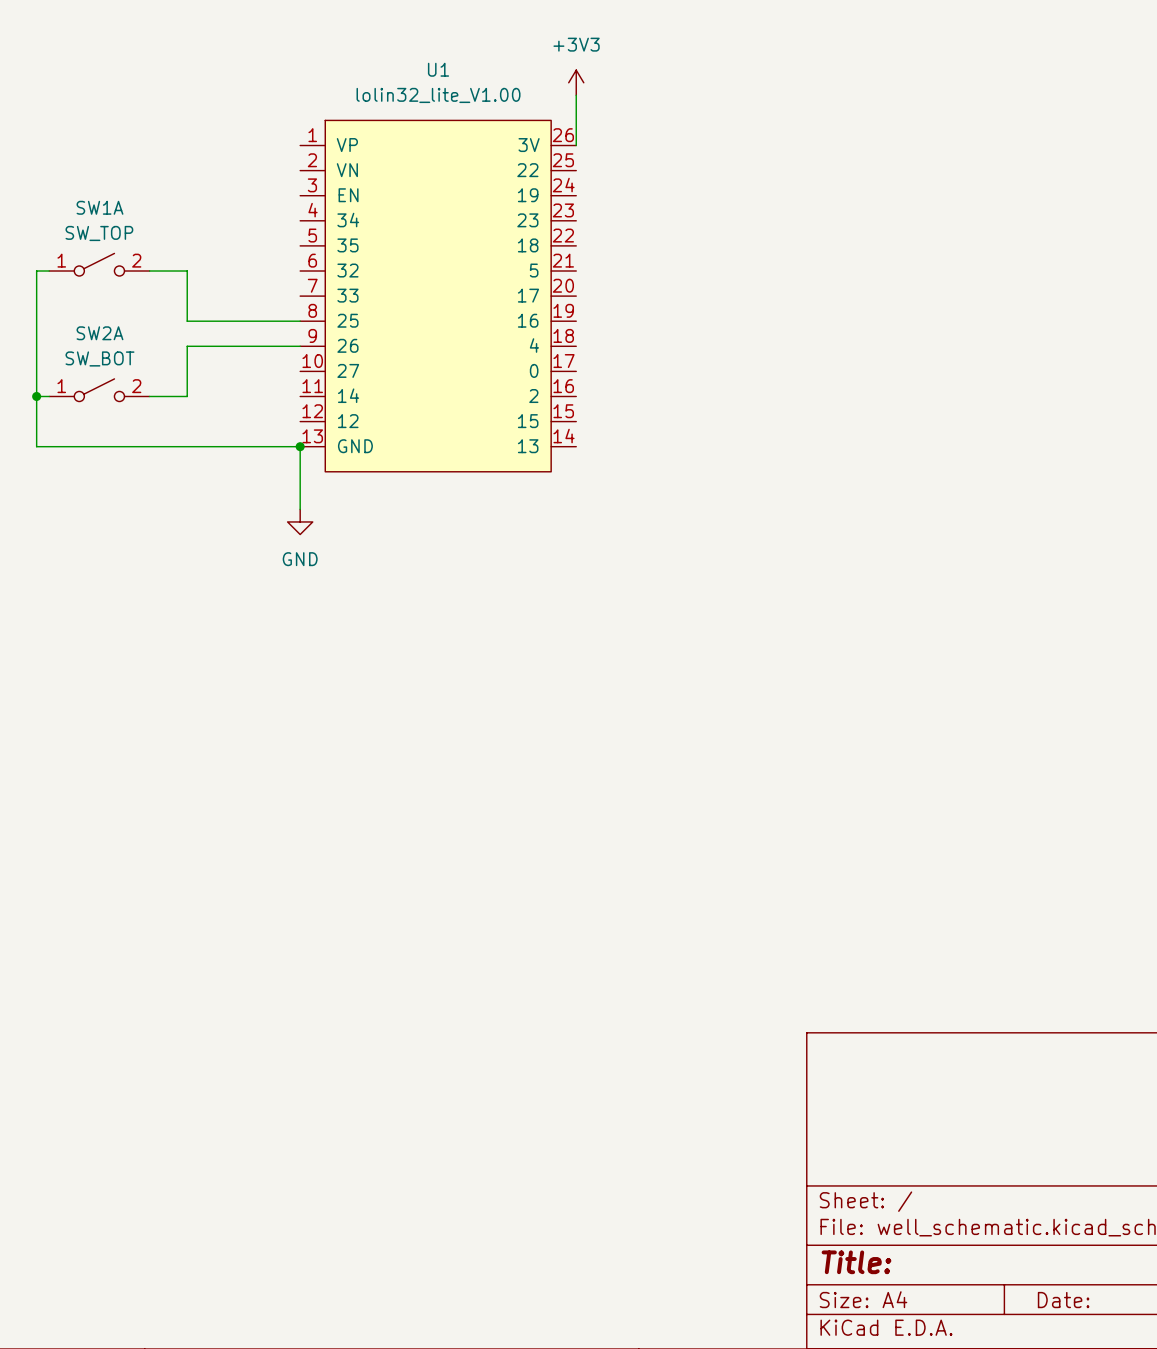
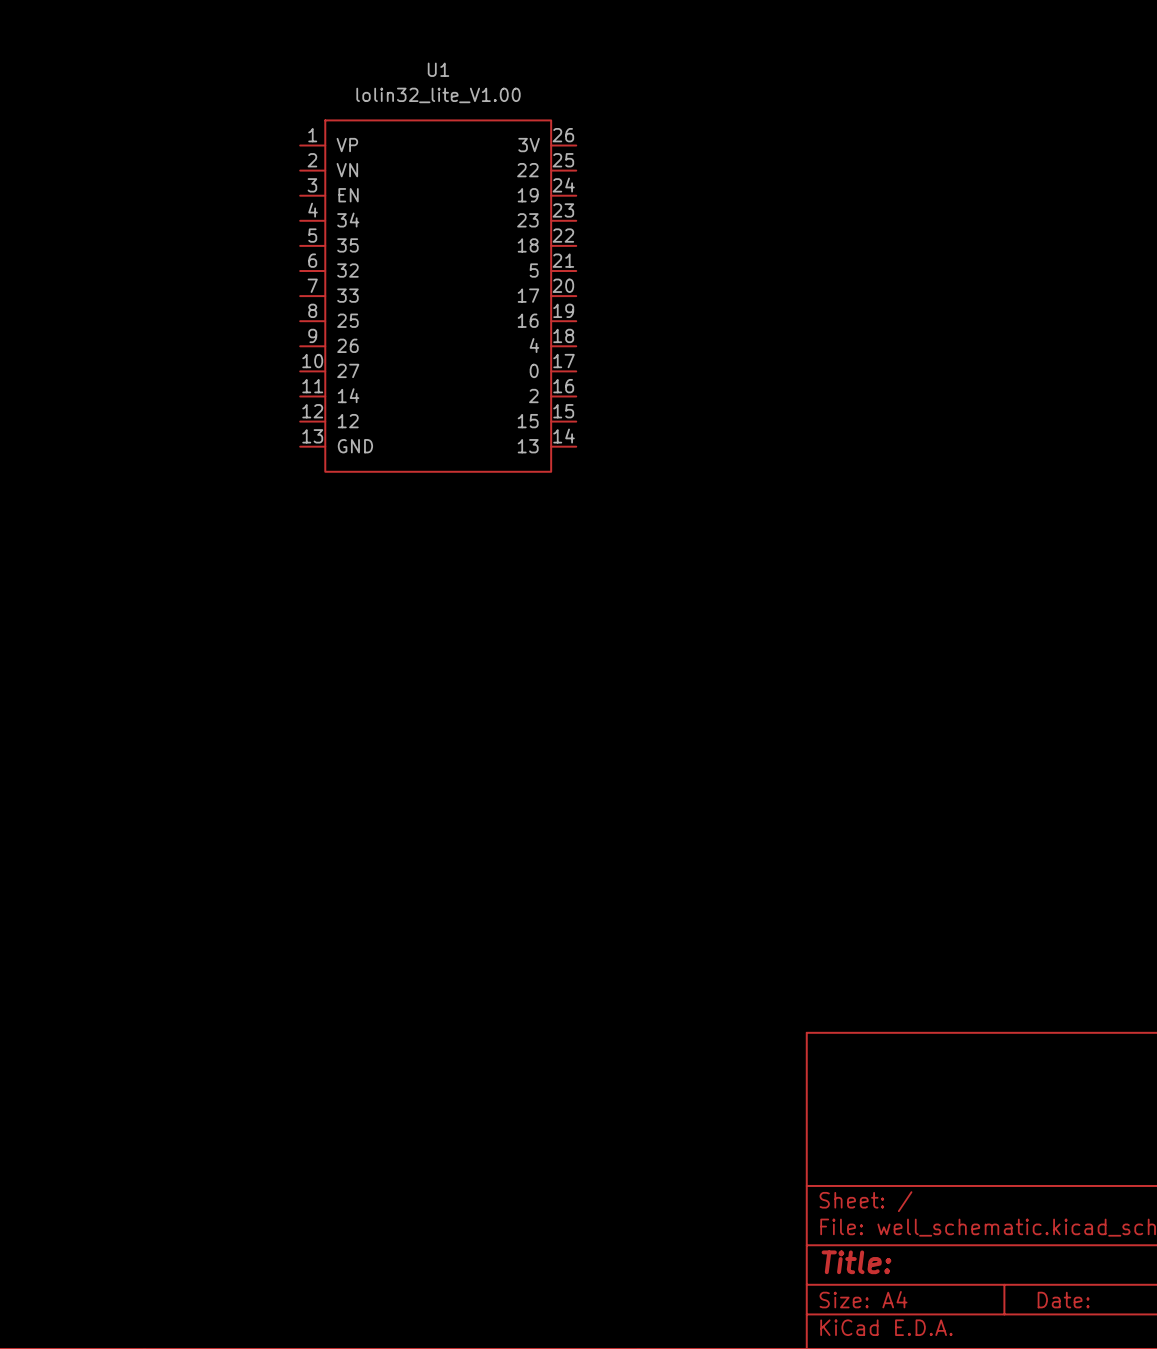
power symbol: +3V3 (576, 82) -> none
wire: (576, 95) (576, 145) -> none
SW1A: SW_TOP (99, 264) -> none
wire: (49, 271) (36, 271) (36, 446) (300, 446) (300, 509) -> none
wire: (149, 271) (187, 271) (187, 321) (300, 321) -> none
wire: (300, 346) (187, 346) (187, 396) (149, 396) -> none
SW2A: SW_BOT (99, 390) -> none
wire: (36, 396) (49, 396) -> none
junction: (36, 396) -> none
junction: (300, 446) -> none
power symbol: GND (300, 521) -> none

